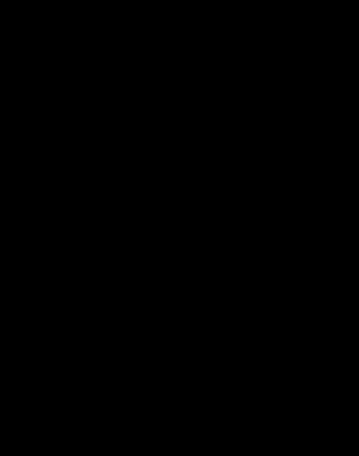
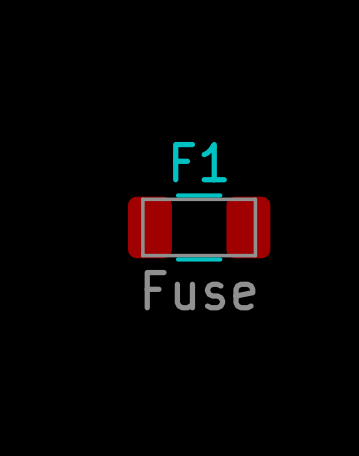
F1: none -> Fuse (199, 227)

